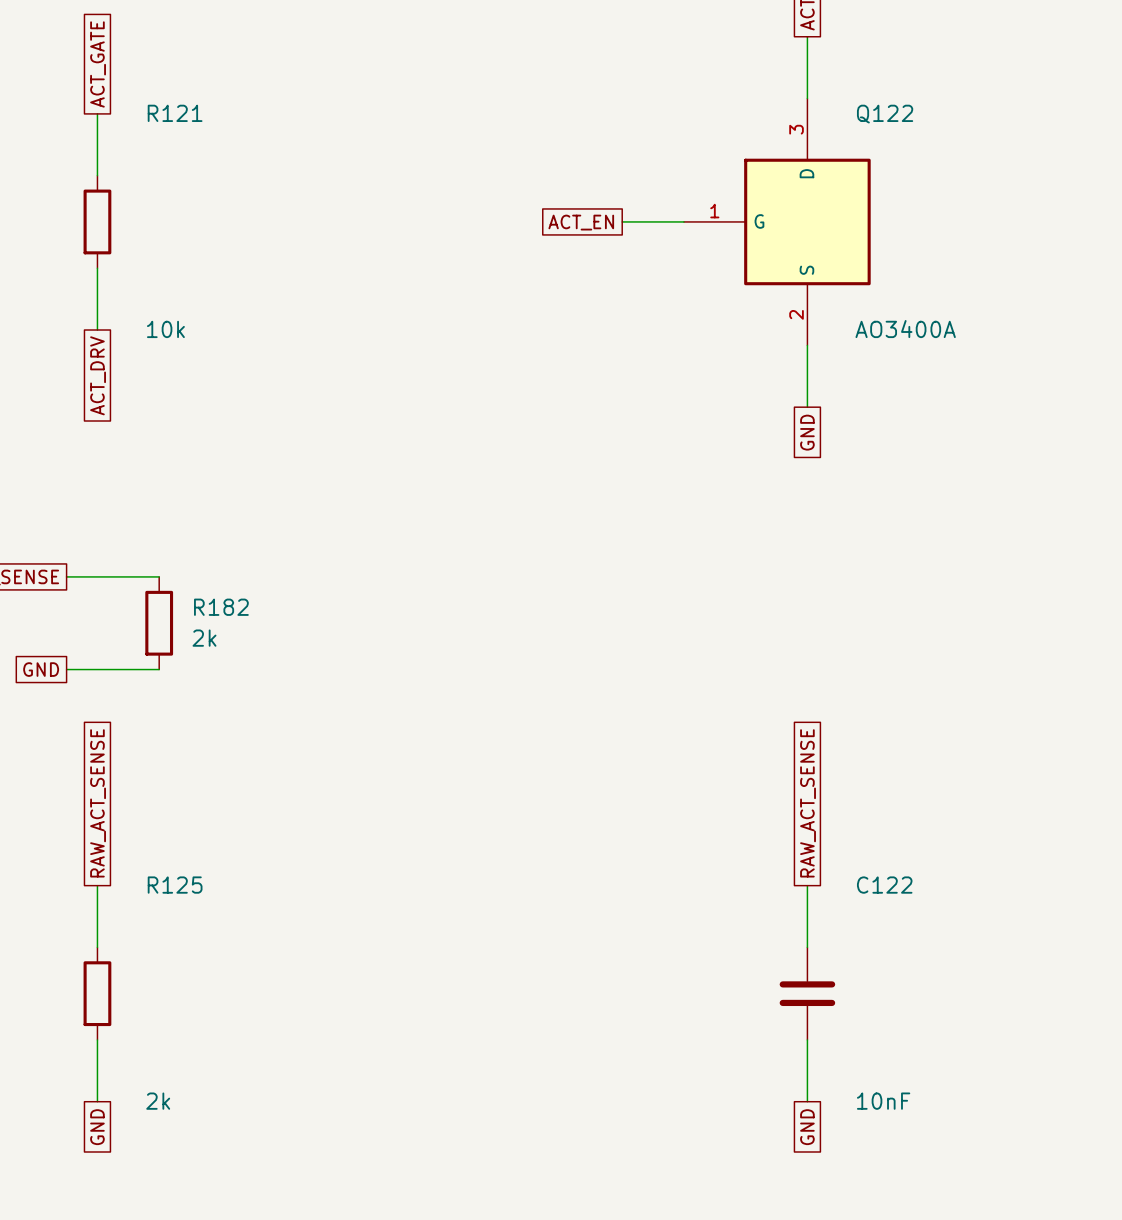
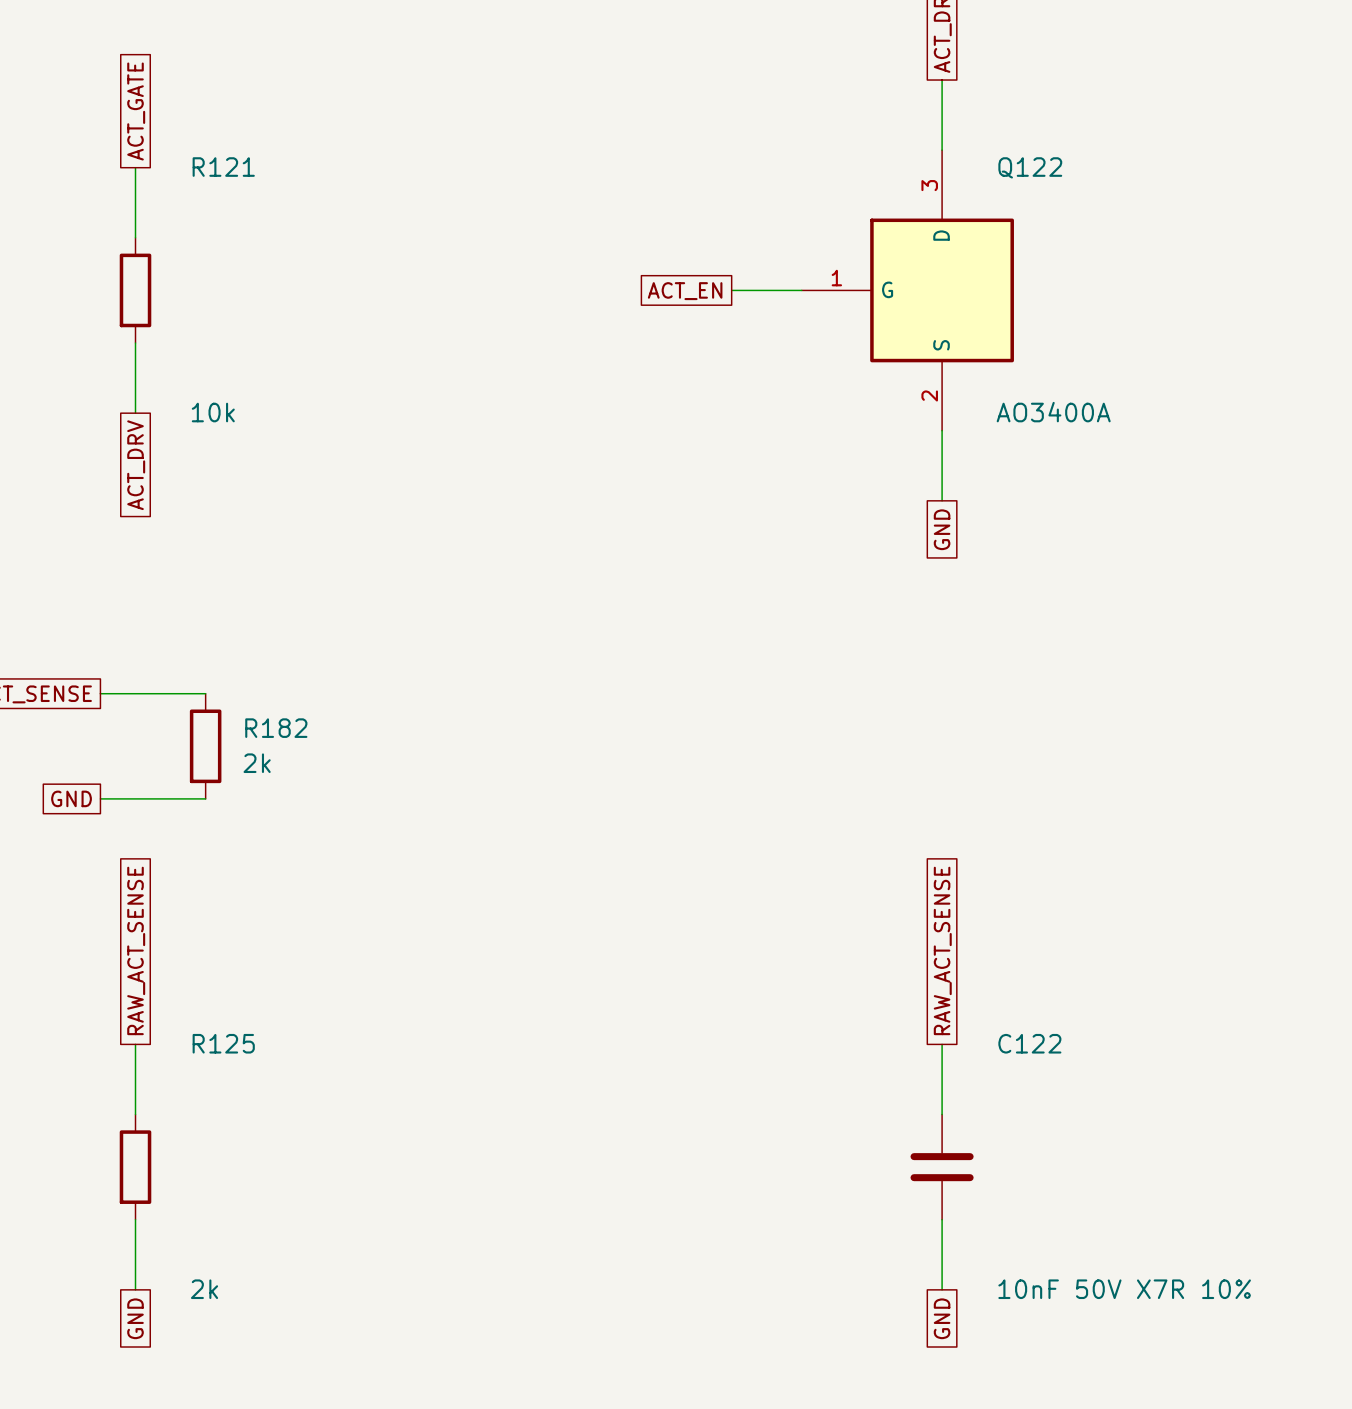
C122 value: 10nF (883, 1101) -> 10nF 50V X7R 10% (1124, 1289)

